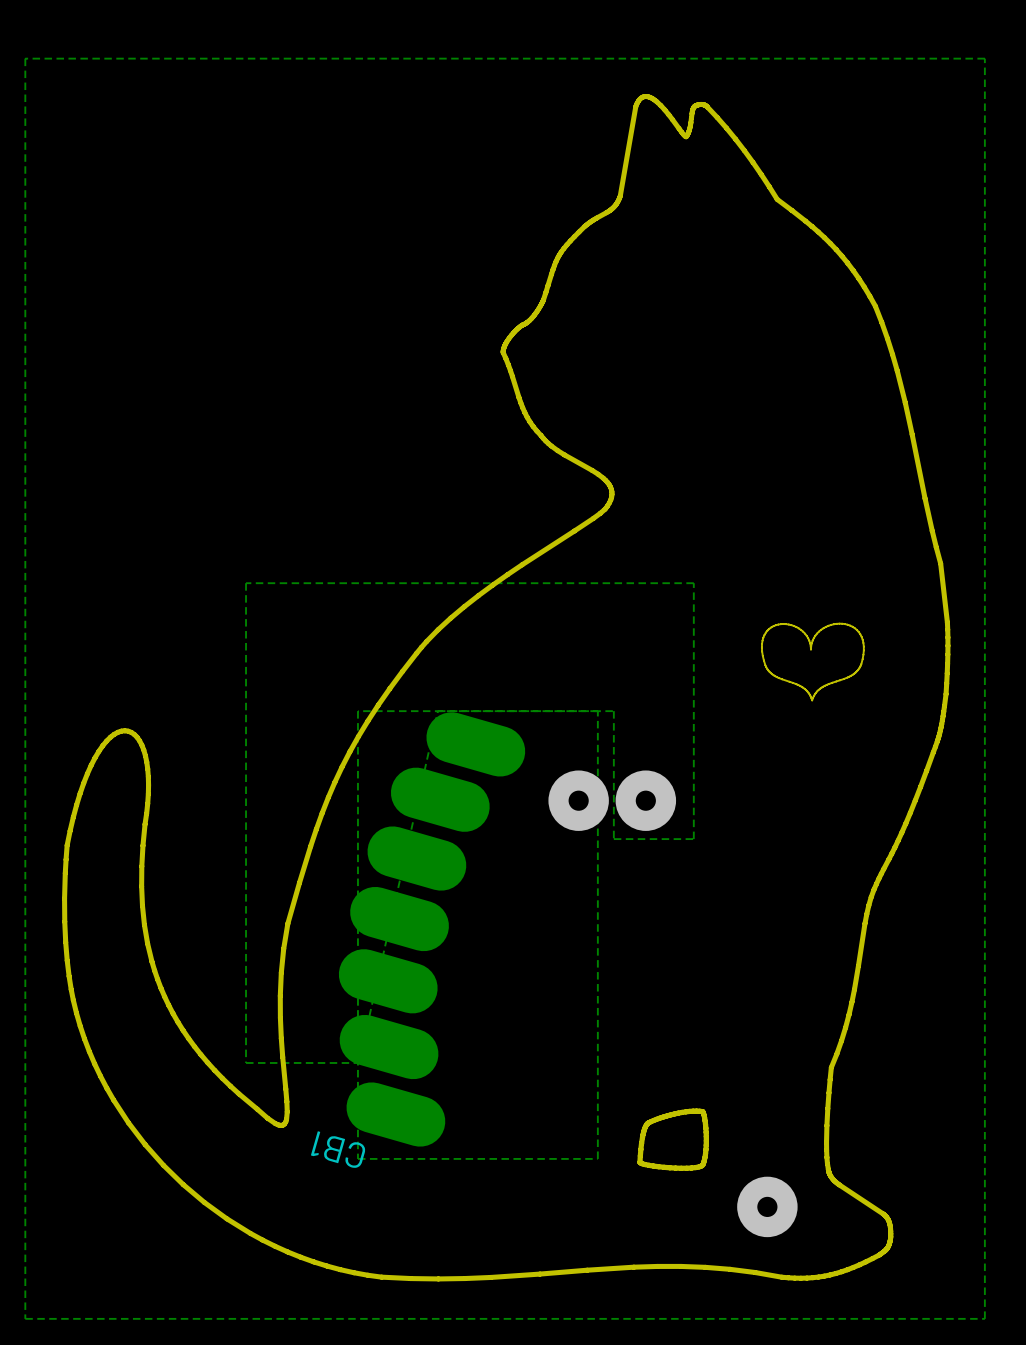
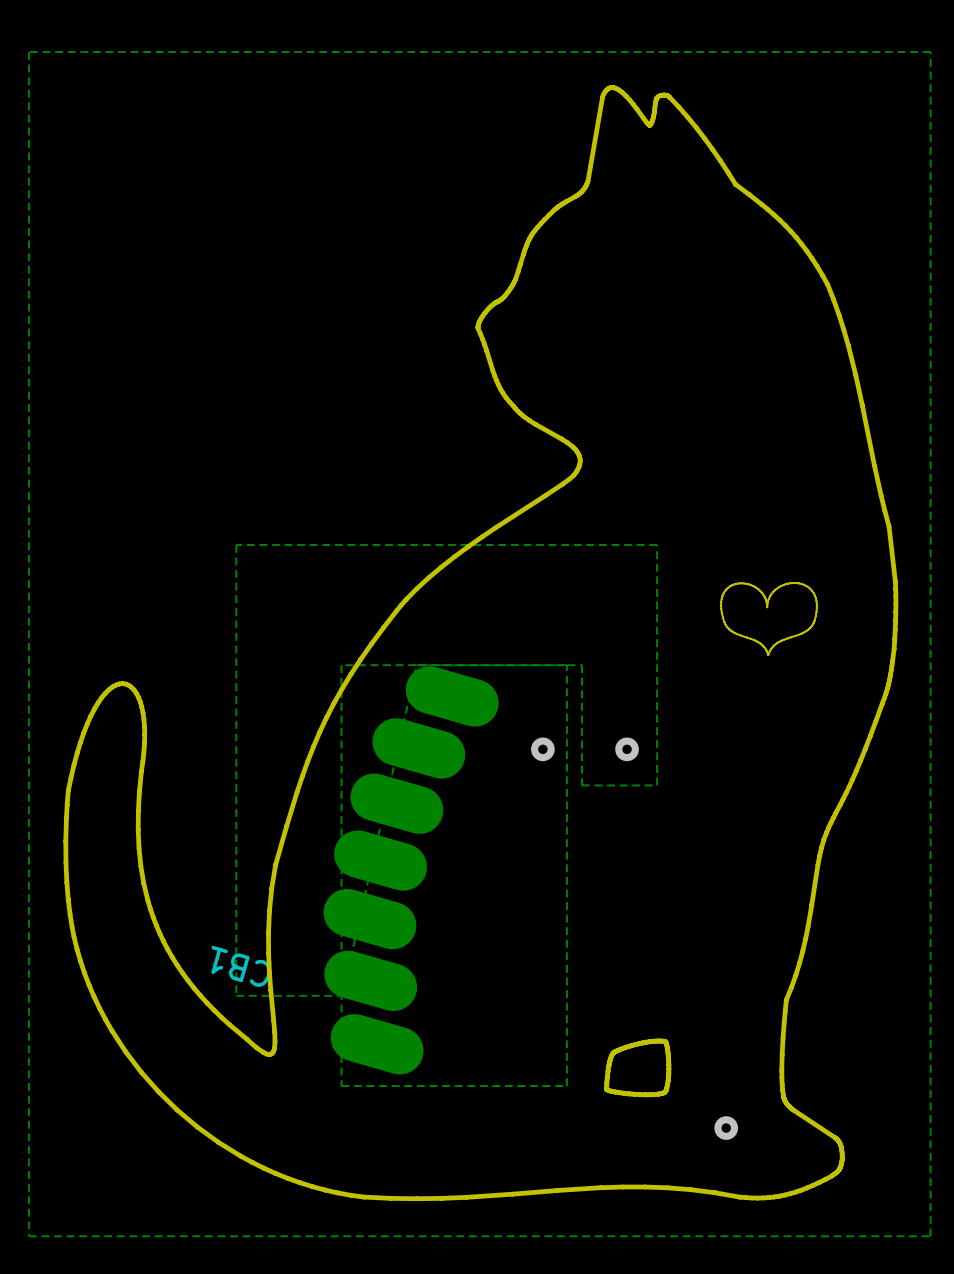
via size: [548, 770, 609, 831] -> [531, 737, 555, 762]
via size: [615, 770, 677, 831] -> [615, 737, 639, 762]
CB1 name position: CB1 (338, 1149) -> CB1 (241, 966)
via size: [737, 1176, 798, 1238] -> [714, 1116, 739, 1140]

